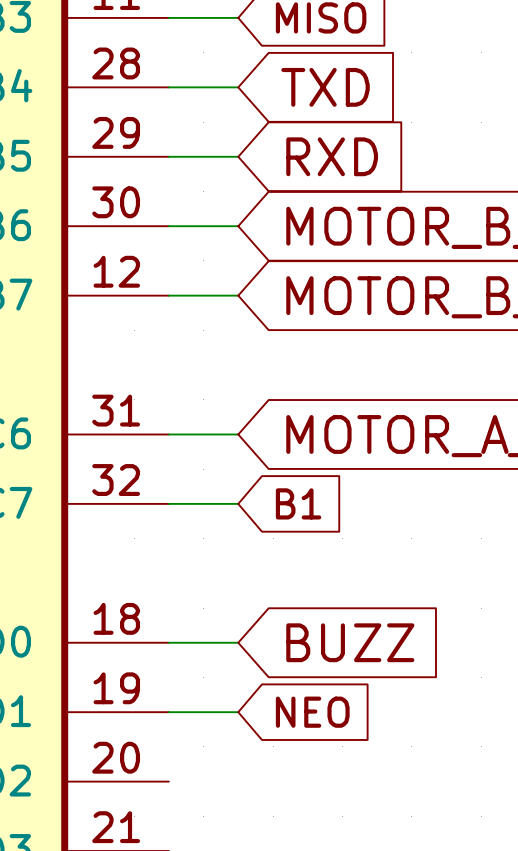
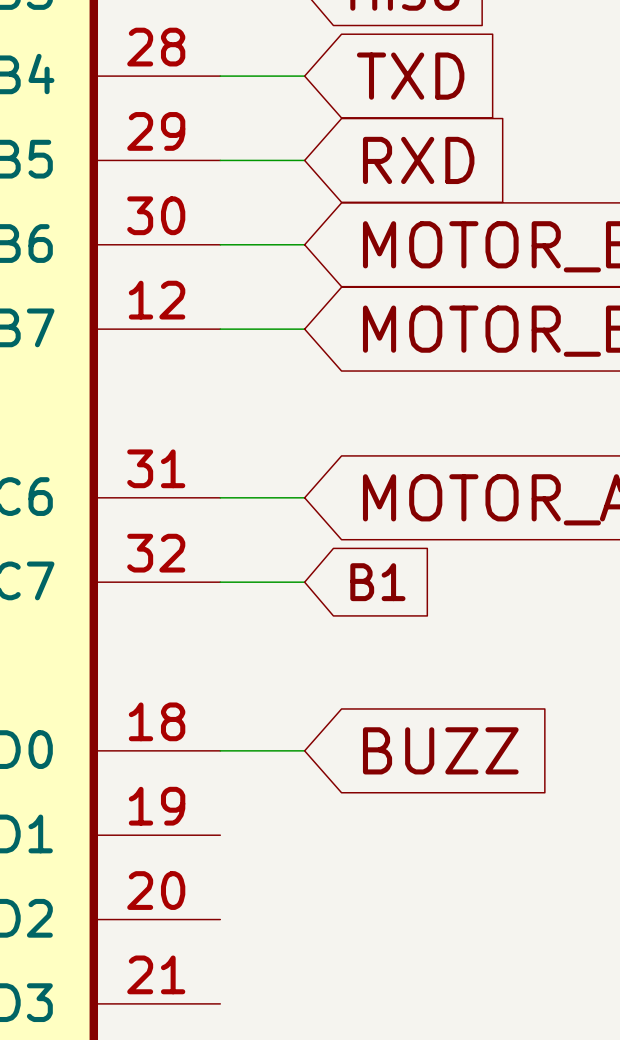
wire: (168, 712) (238, 712) -> none
global label: NEO (312, 712) -> none

